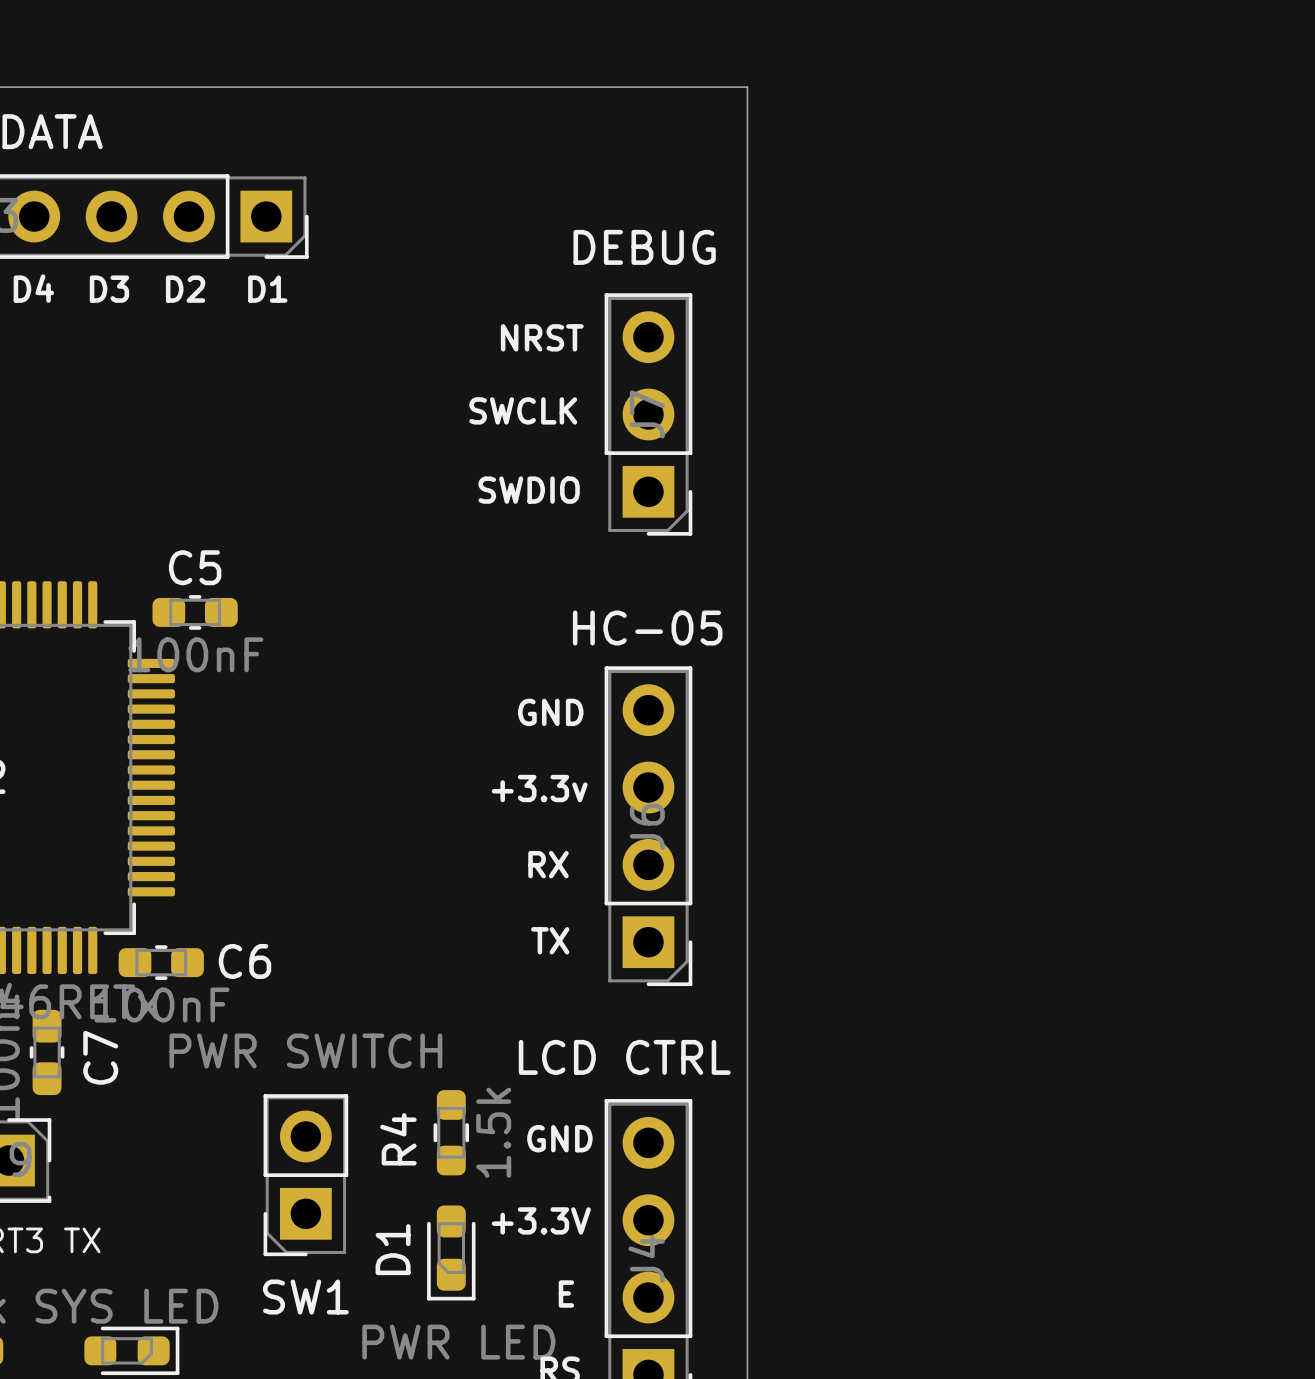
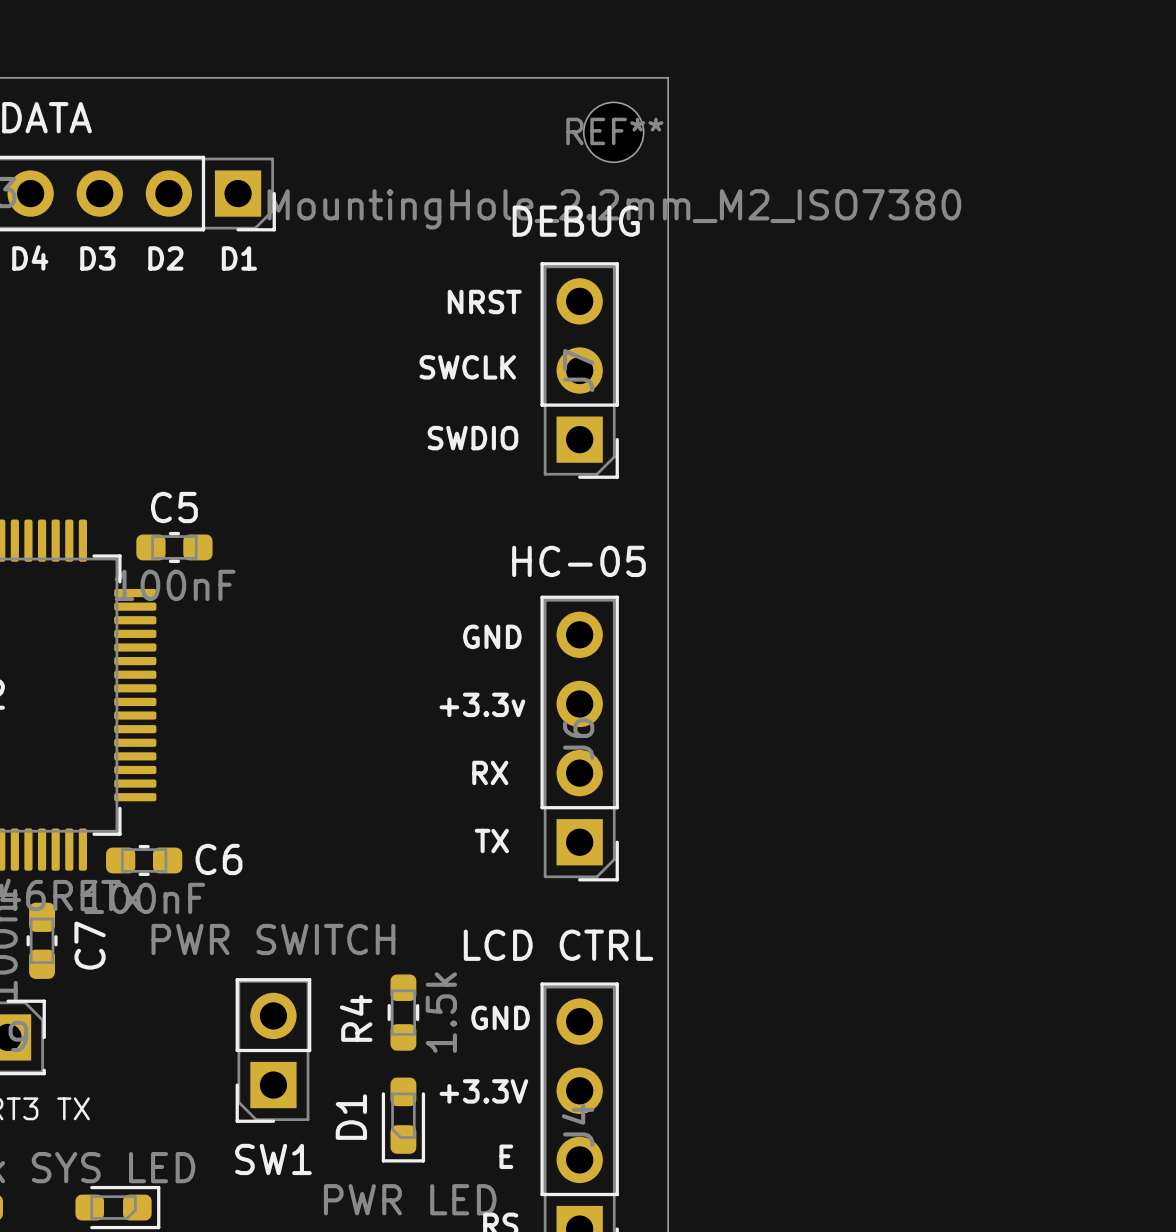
REF**: none -> MountingHole_2.2mm_M2_ISO7380 (613, 132)

